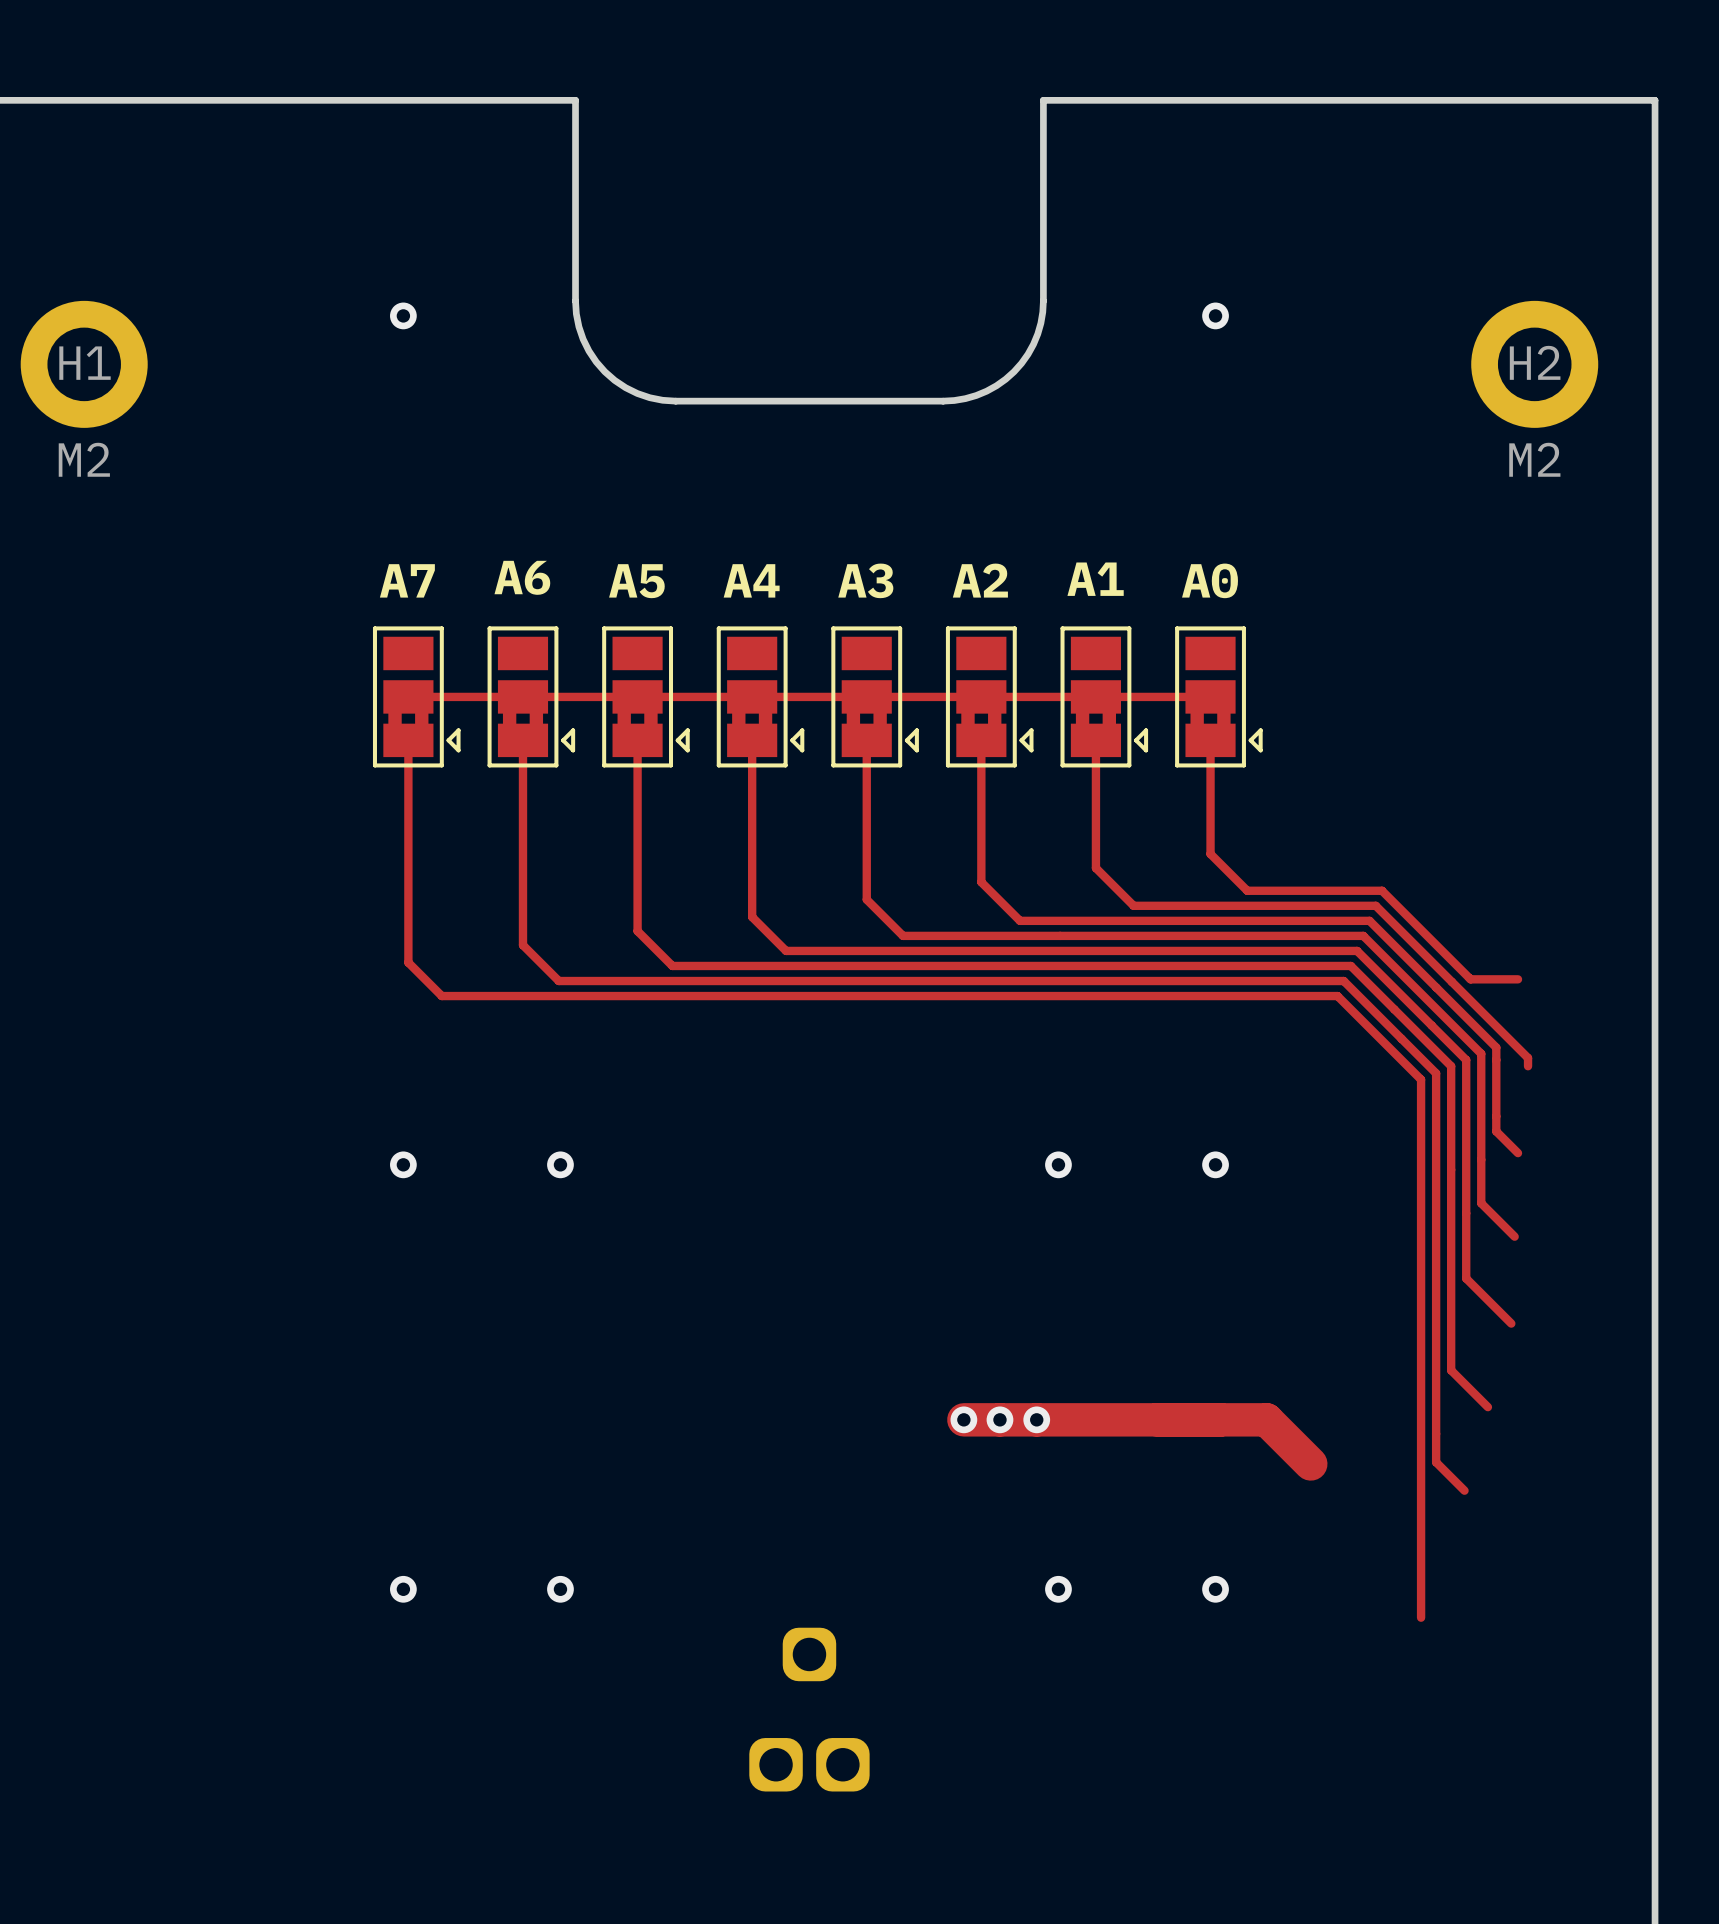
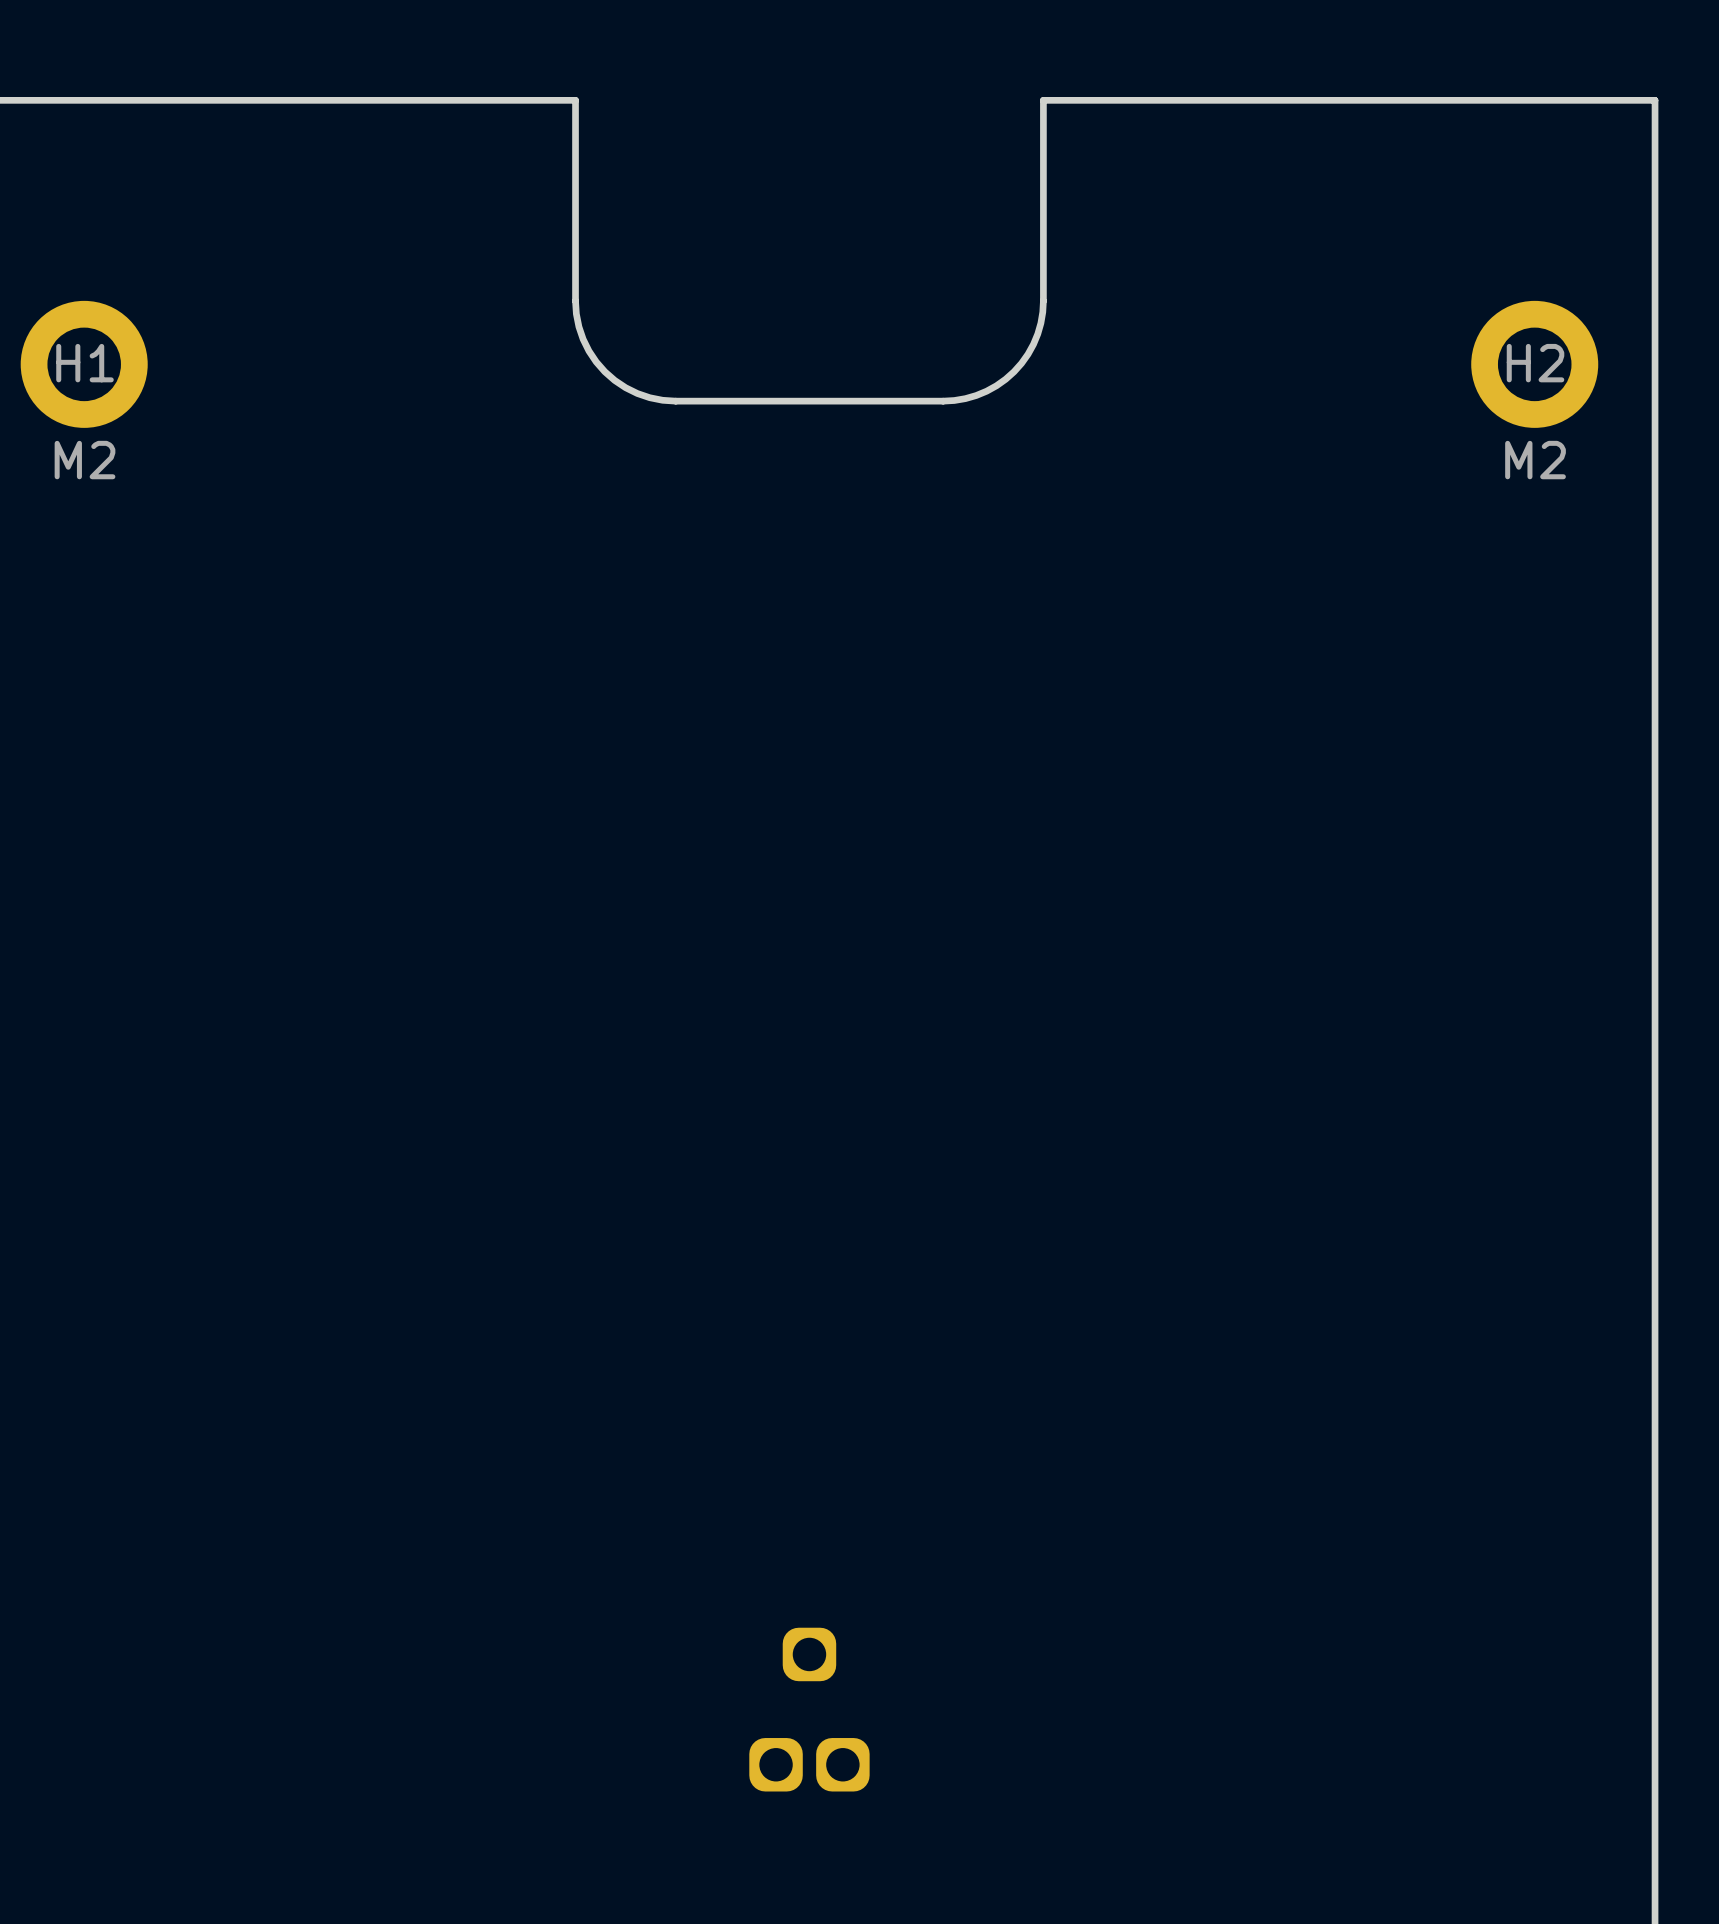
via: (403, 315) -> none
via: (1215, 315) -> none
text: A6 (522, 577) -> none
text: A1 (1095, 579) -> none
text: A7 (407, 580) -> none
text: A4 (751, 580) -> none
text: A3 (865, 580) -> none
text: A2 (980, 580) -> none
text: A0 (1210, 580) -> none
text: A5 (636, 581) -> none
track: (408, 696) (1210, 696) -> none
part: (416, 696) -> none
part: (531, 696) -> none
part: (645, 696) -> none
part: (760, 696) -> none
part: (875, 696) -> none
part: (989, 696) -> none
part: (1104, 696) -> none
part: (1218, 696) -> none
track: (408, 740) (408, 962) (441, 996) (1337, 996) (1421, 1079) (1421, 1617) -> none
track: (522, 740) (522, 945) (558, 981) (1343, 981) (1436, 1073) (1436, 1462) (1464, 1490) -> none
track: (637, 740) (637, 931) (672, 965) (1350, 965) (1451, 1066) (1451, 1370) (1487, 1407) -> none
track: (752, 740) (752, 917) (786, 950) (1357, 950) (1466, 1060) (1466, 1278) (1511, 1323) -> none
track: (866, 740) (866, 899) (903, 935) (1363, 935) (1481, 1053) (1481, 1203) (1514, 1236) -> none
track: (981, 740) (981, 882) (1020, 920) (1369, 920) (1496, 1047) (1496, 1131) (1518, 1153) -> none
track: (1095, 740) (1095, 868) (1133, 905) (1375, 905) (1528, 1058) (1528, 1066) -> none
track: (1210, 740) (1210, 854) (1247, 890) (1382, 890) (1470, 979) (1518, 979) -> none
via: (403, 1164) -> none
via: (560, 1164) -> none
via: (1058, 1164) -> none
via: (1215, 1164) -> none
track: (963, 1419) (1266, 1419) (1310, 1463) -> none
via: (963, 1419) -> none
via: (999, 1419) -> none
via: (1036, 1419) -> none
via: (403, 1589) -> none
via: (560, 1589) -> none
via: (1058, 1589) -> none
via: (1215, 1589) -> none

